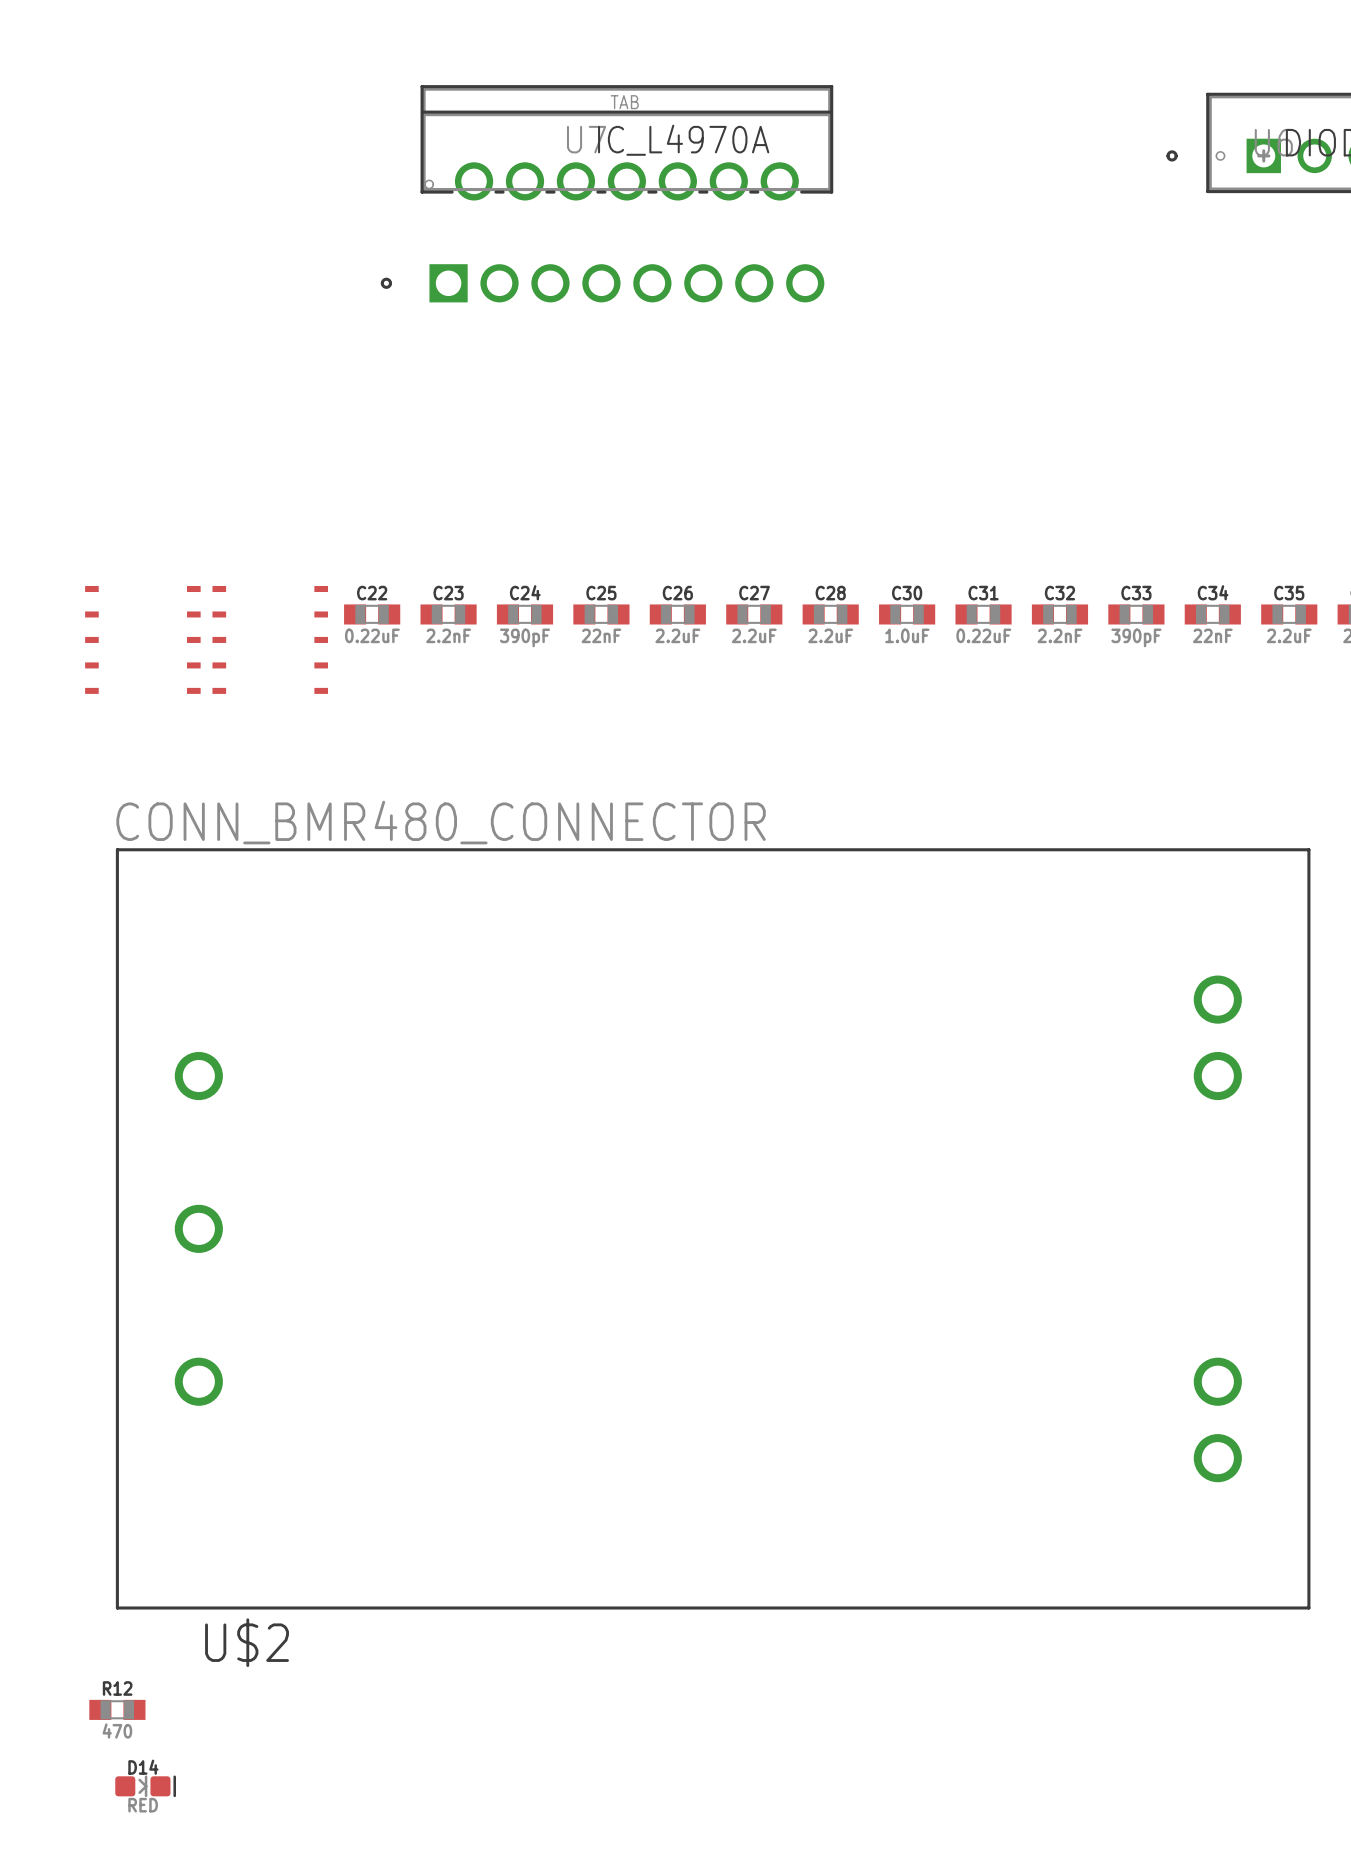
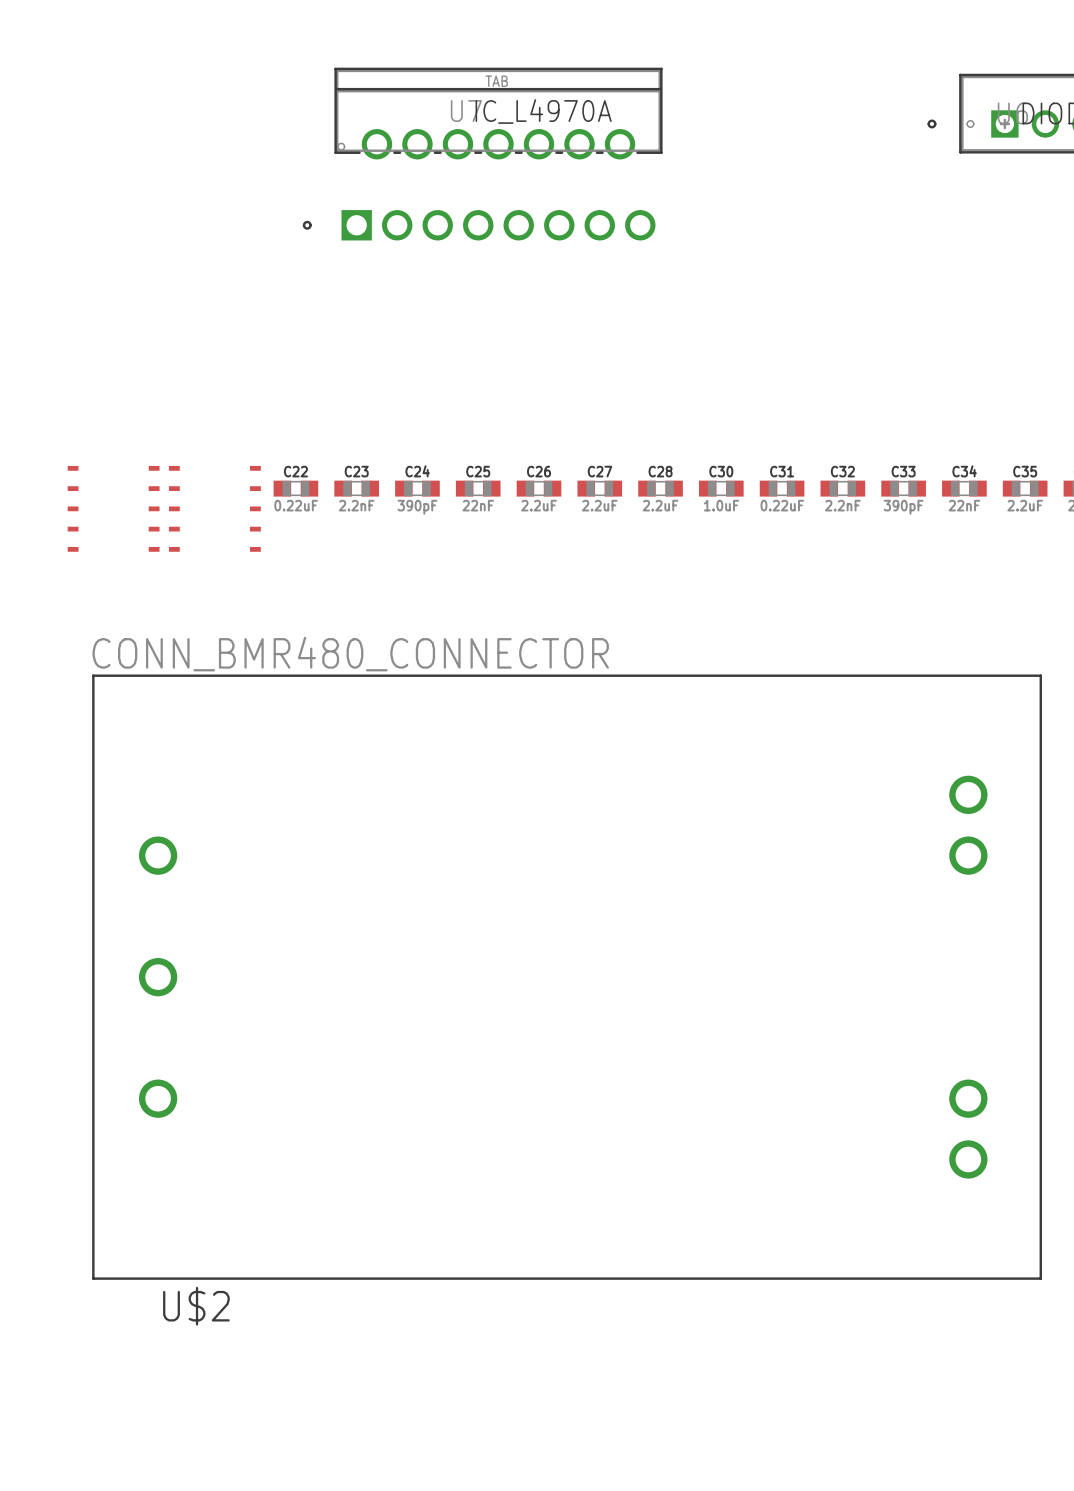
R12: 470 (117, 1709) -> none
D14: RED (145, 1786) -> none

